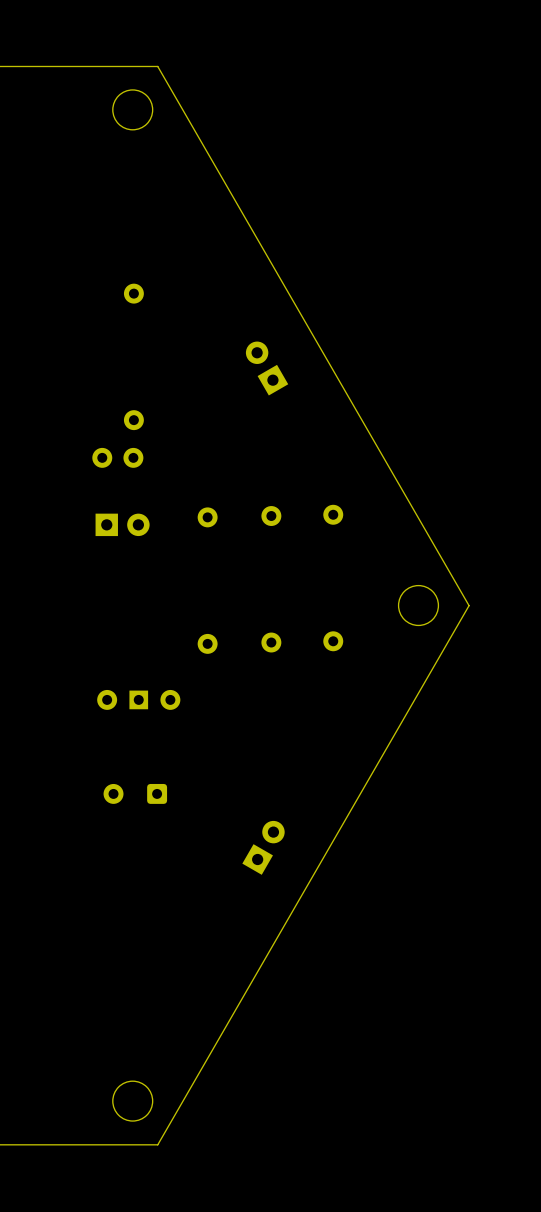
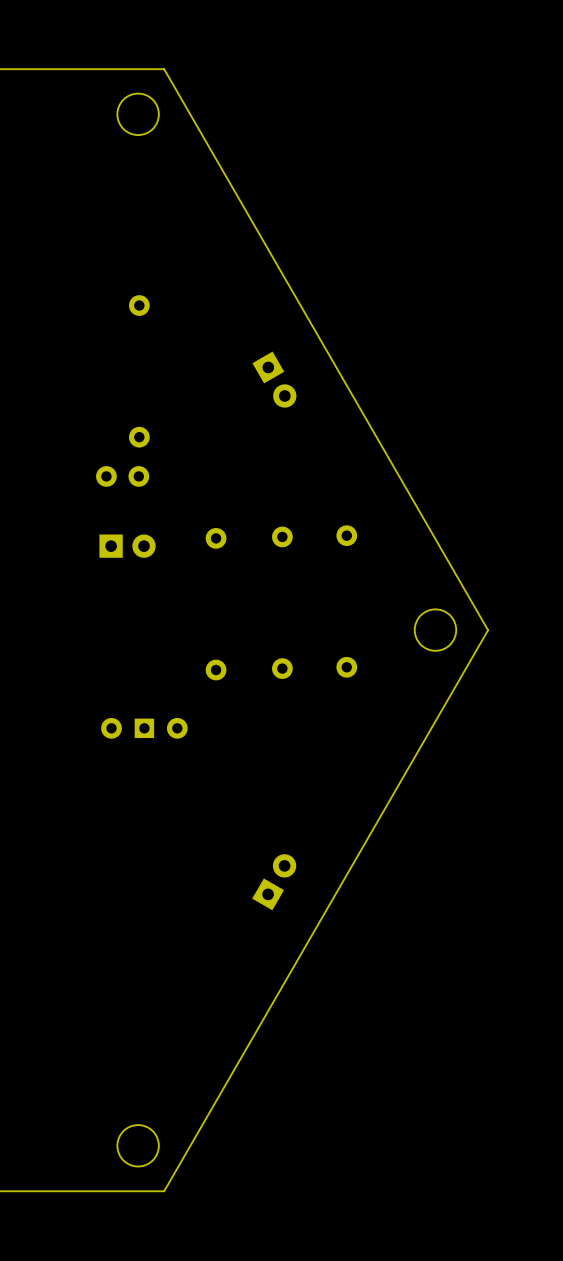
part rotation: 0° (267, 368) -> 180° (274, 379)
part: (135, 793) -> none

